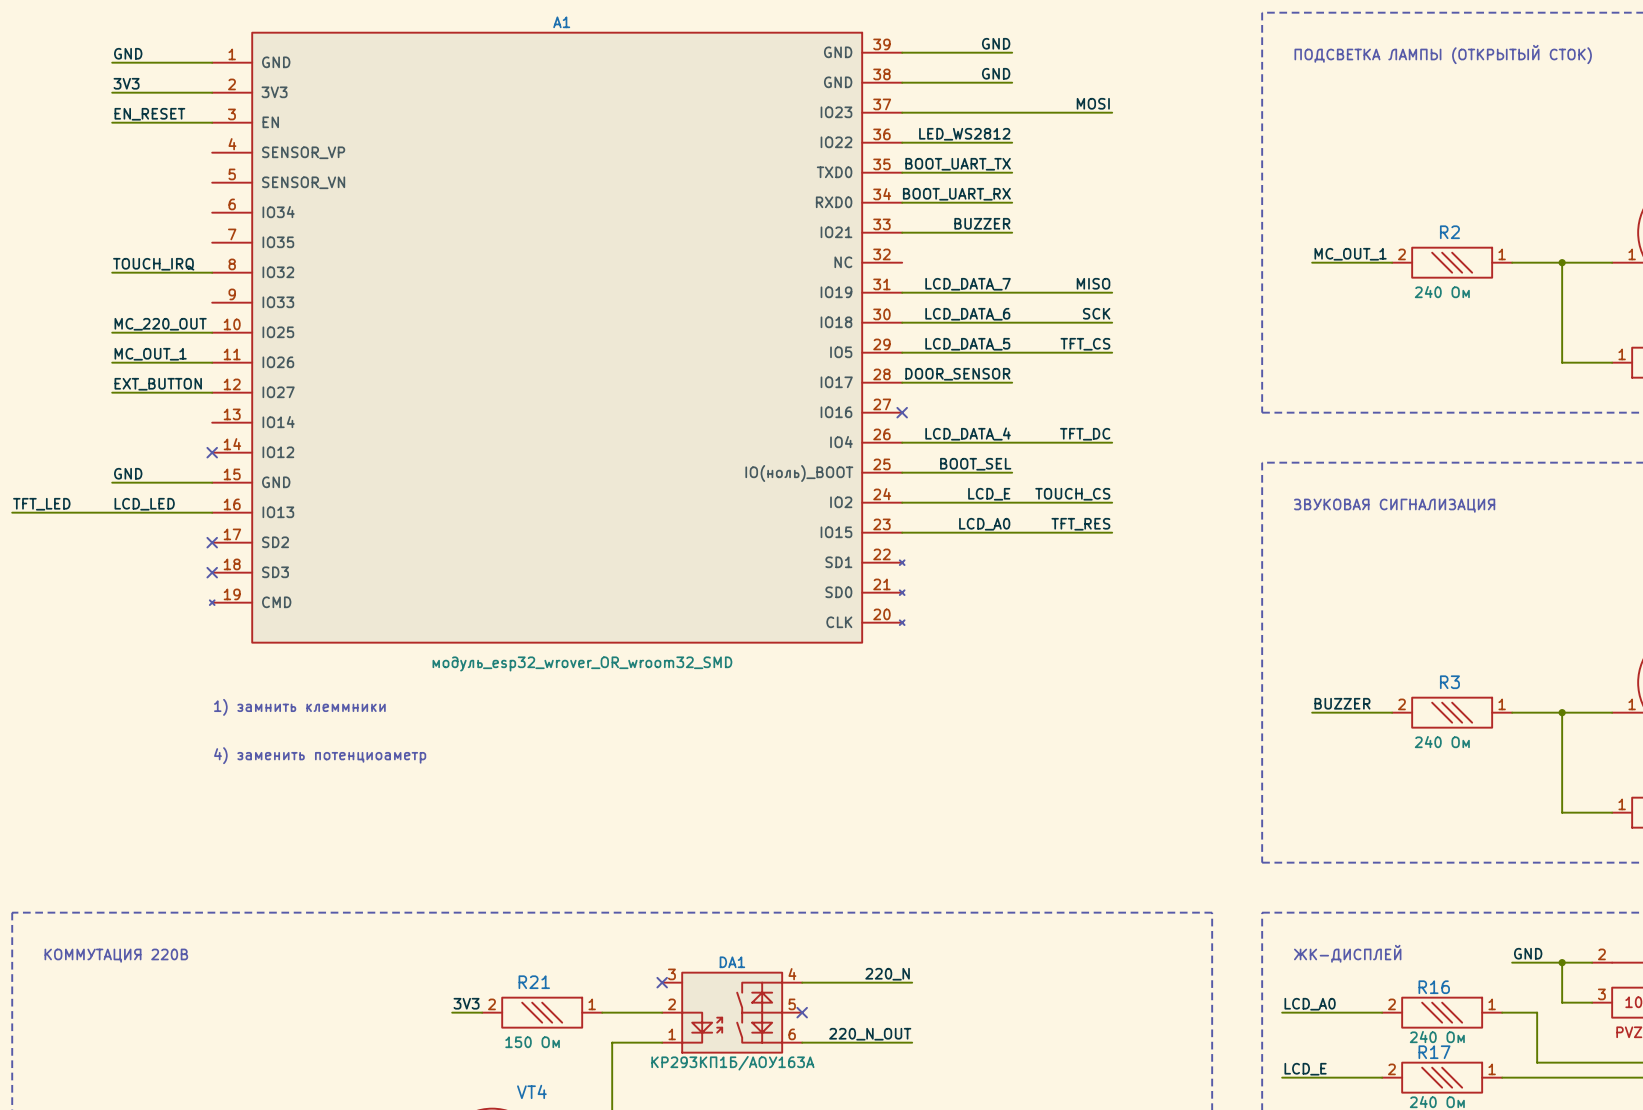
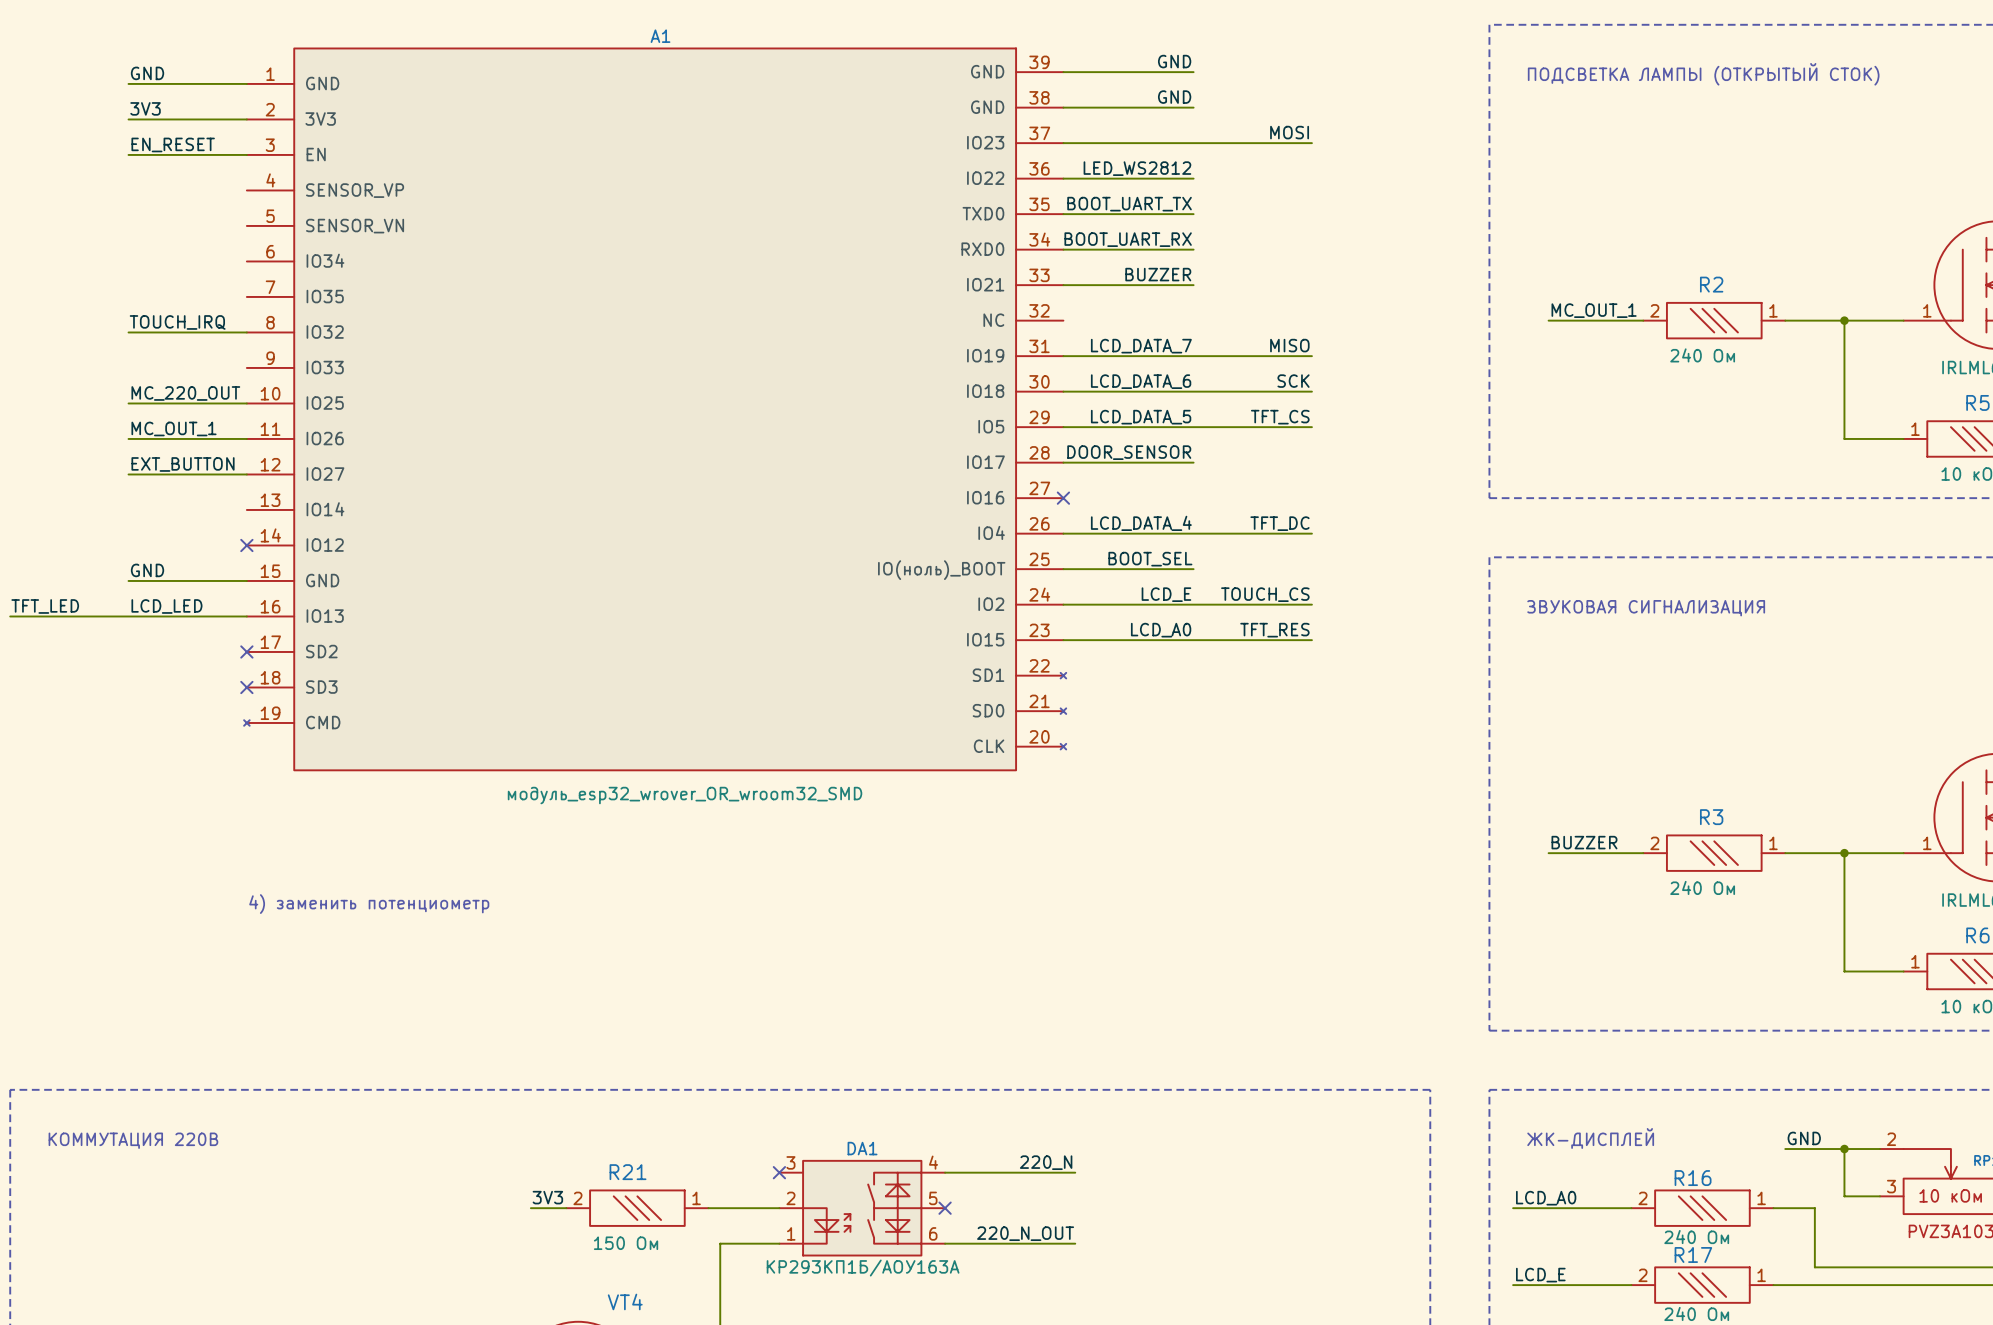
text: 1) замнить клеммники (299, 707) -> none
text: 4) заменить потенциоаметр (320, 755) -> 4) заменить потенциометр (369, 904)

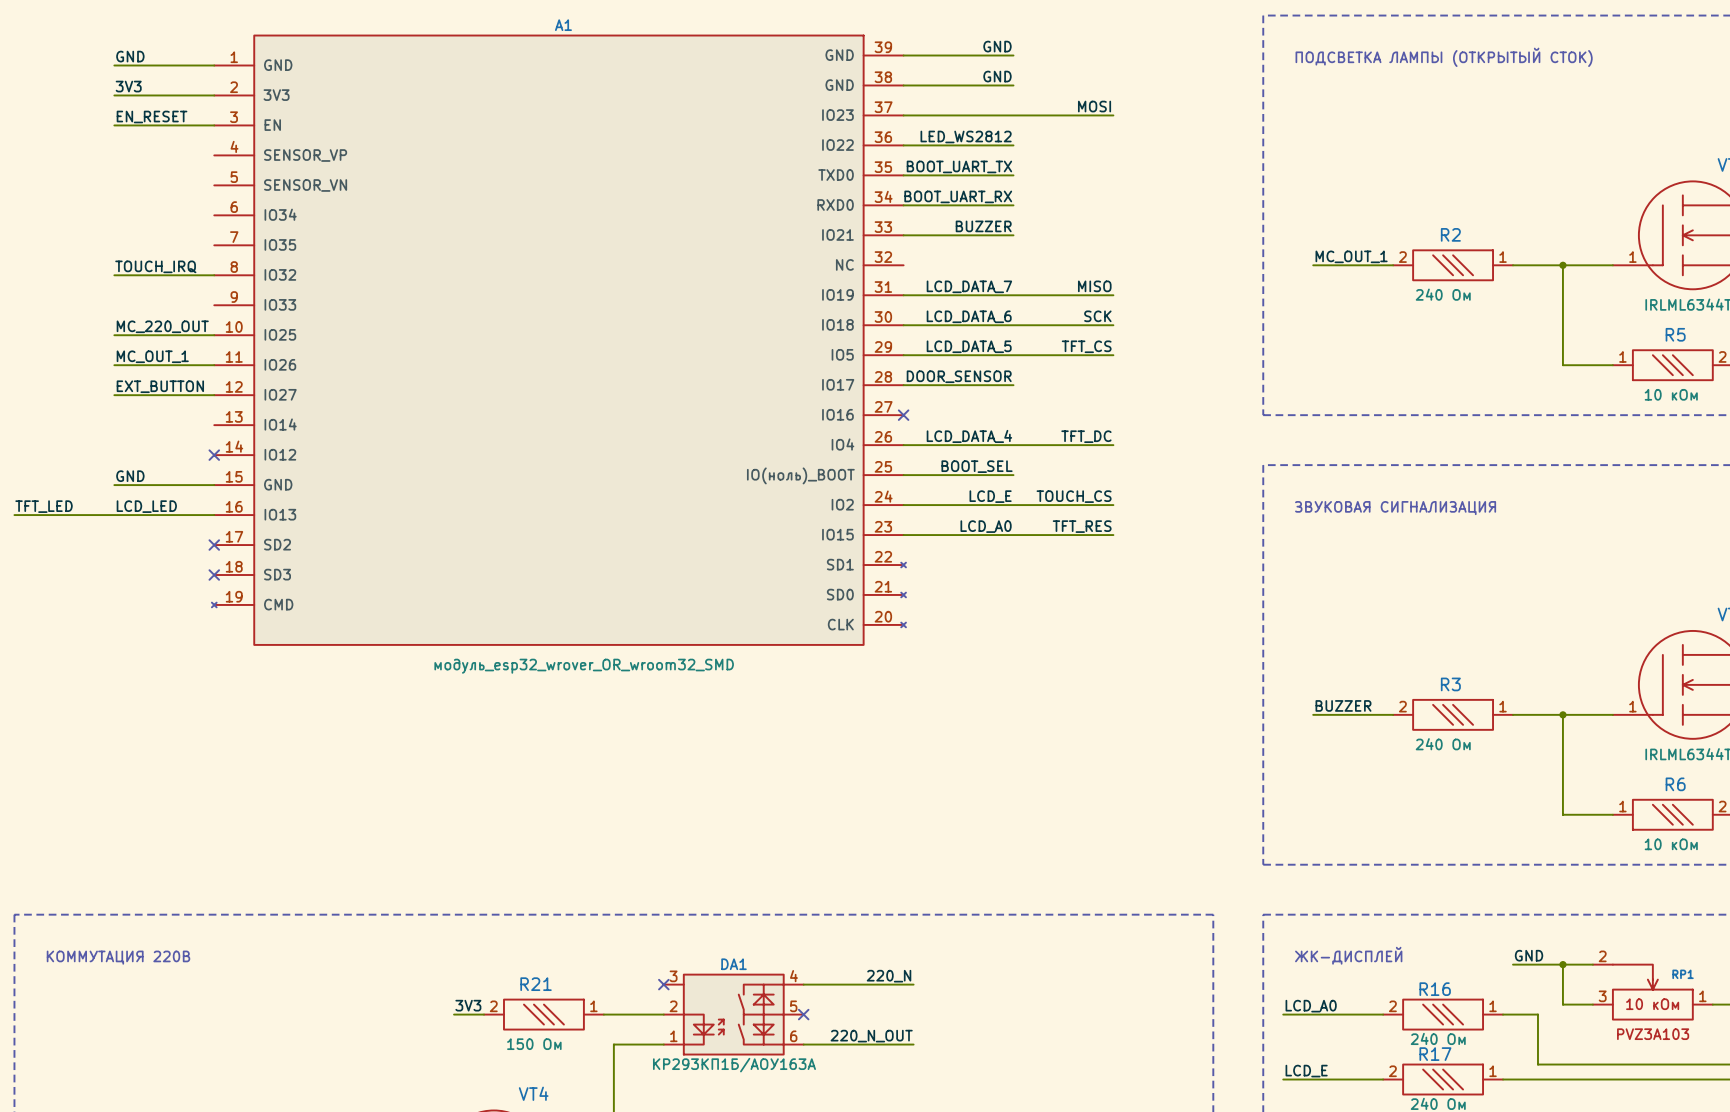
text: 4) заменить потенциометр (369, 904) -> none

